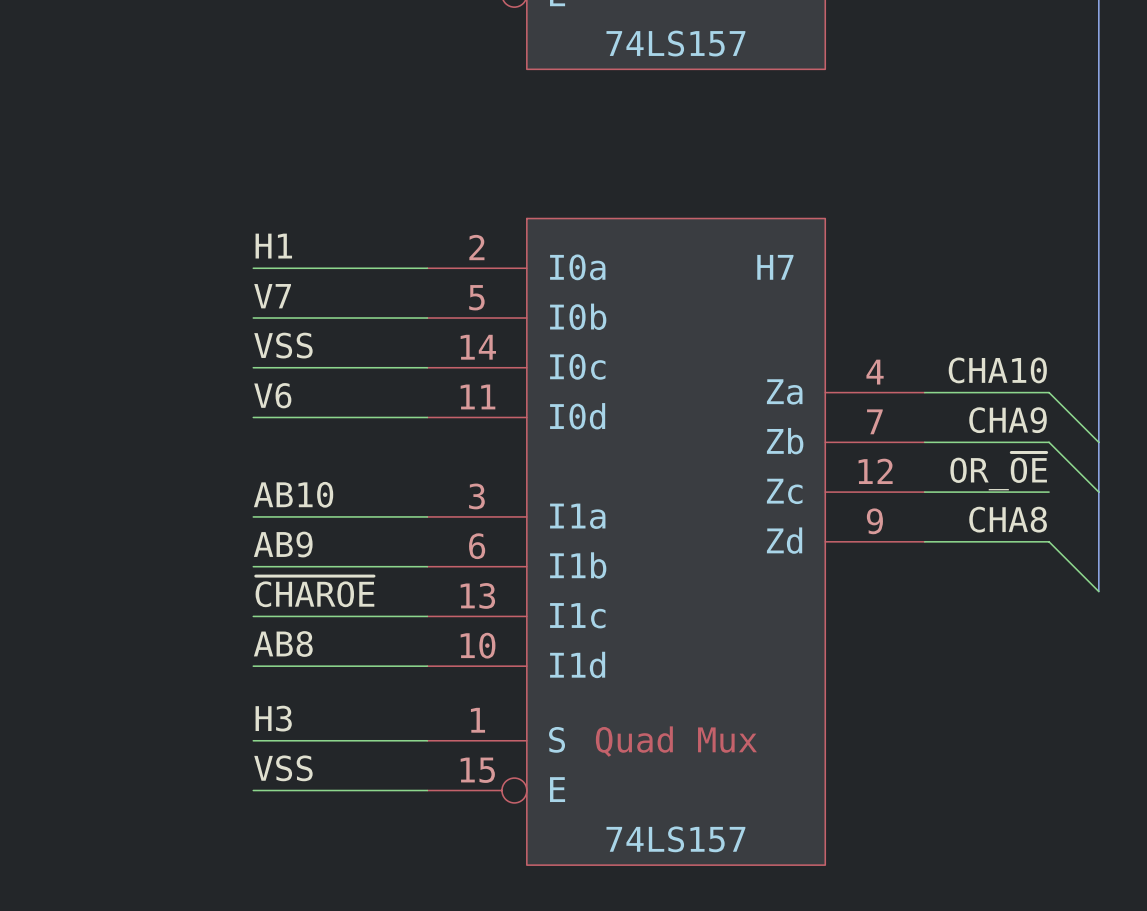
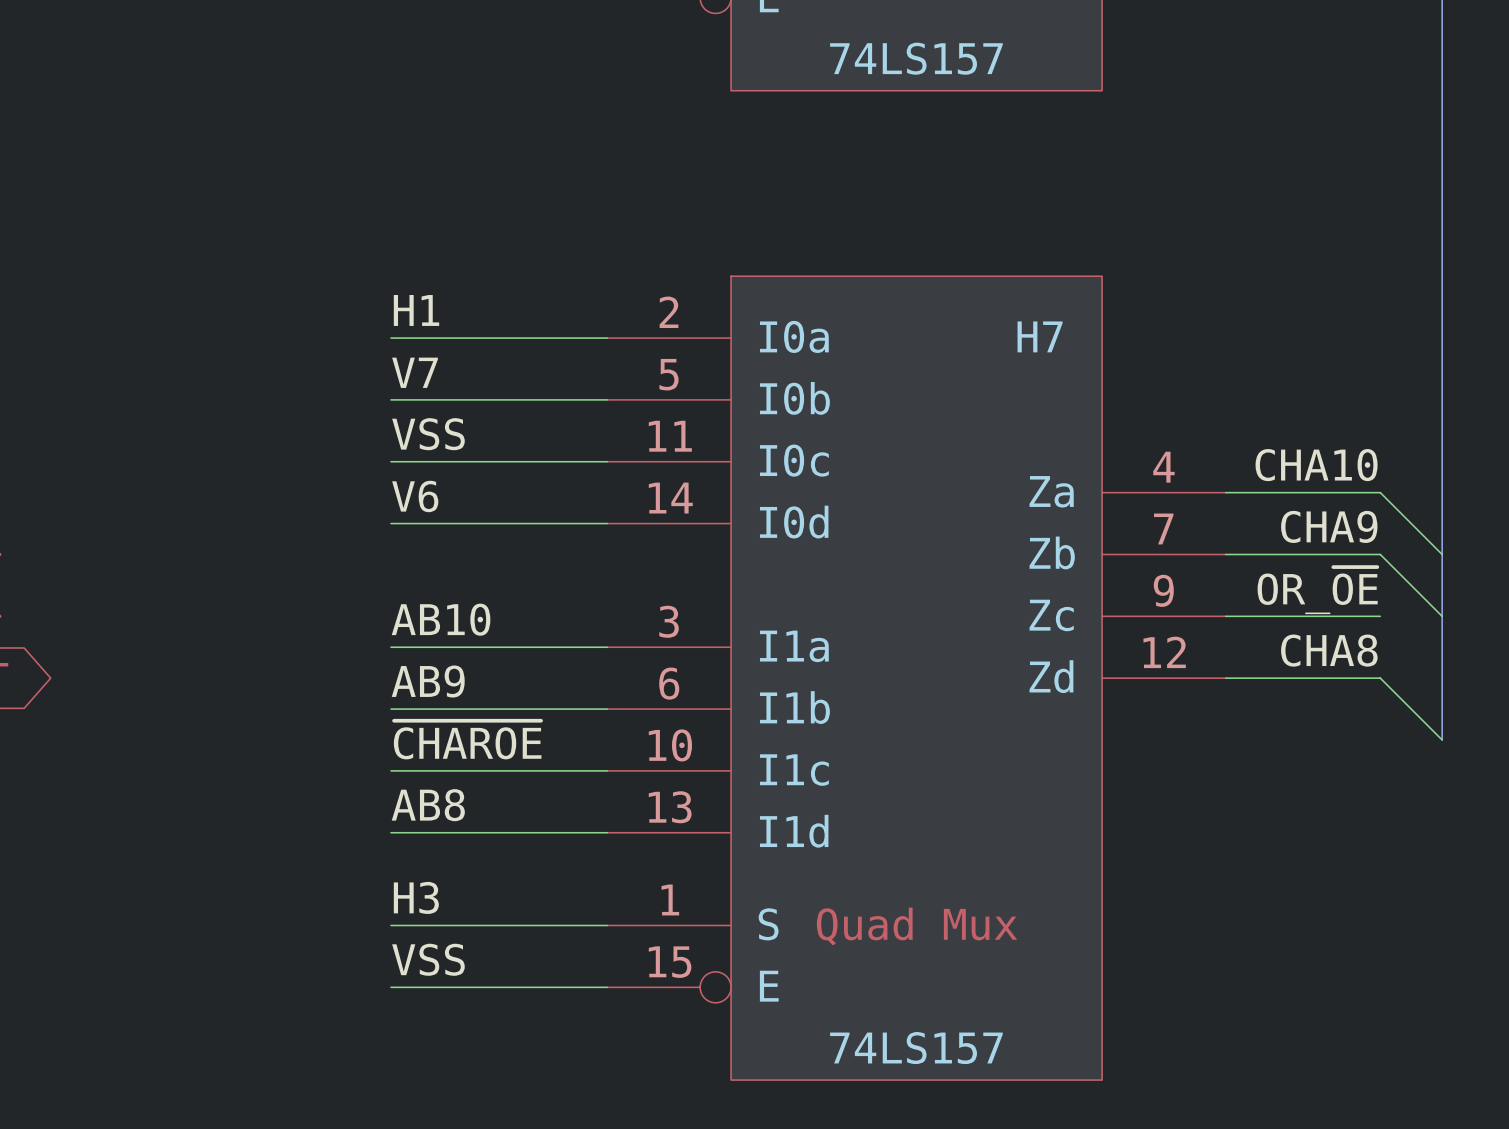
H7 pin number: 14 (478, 347) -> 11 (670, 436)
H7 pin number: 11 (477, 396) -> 14 (670, 498)
H7 pin number: 12 (875, 471) -> 9 (1163, 590)
H7 pin number: 9 (874, 521) -> 12 (1164, 652)
H7 pin number: 13 (477, 595) -> 10 (670, 745)
H7 pin number: 10 (478, 645) -> 13 (670, 807)

